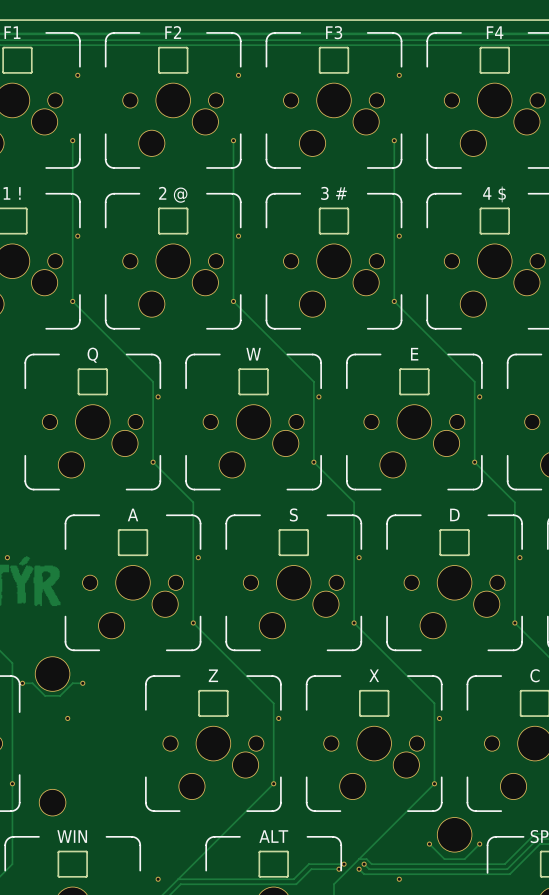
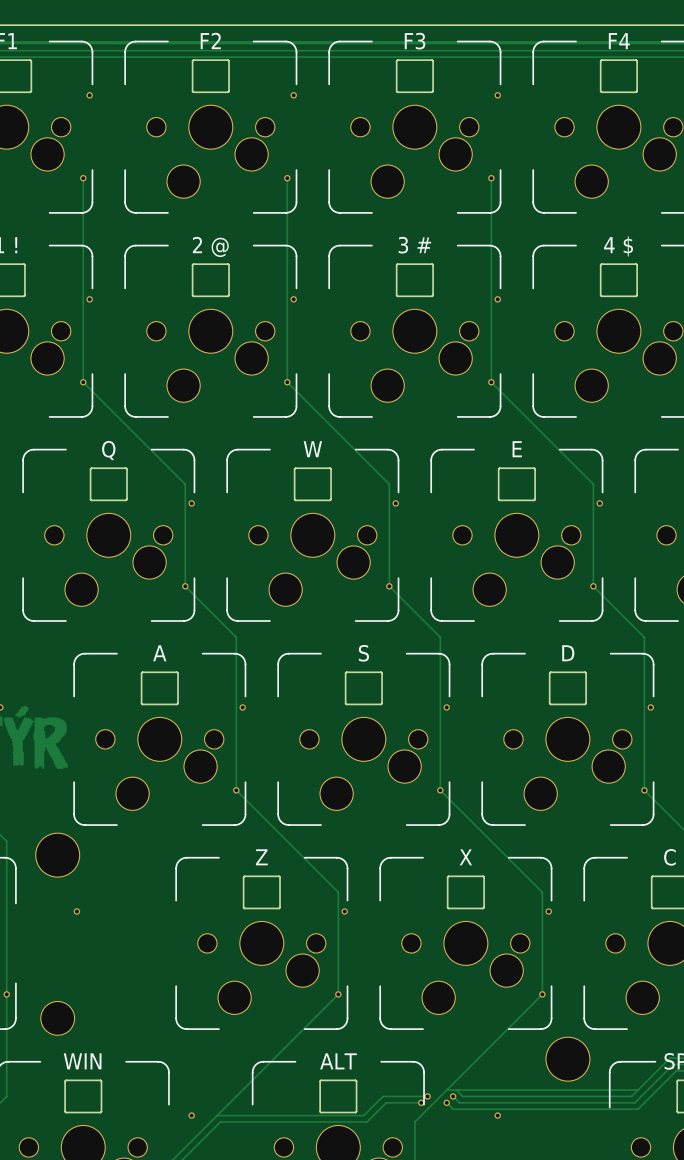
track: (22, 683) (32, 683) (45, 695) (60, 695) (72, 683) (82, 683) -> none
via: (22, 683) -> none
via: (82, 683) -> none
track: (429, 844) (444, 859) -> (456, 1090) (555, 1090)
via: (429, 844) -> none
track: (479, 844) (464, 859) -> (638, 1090) (580, 1090)
via: (479, 844) -> none

